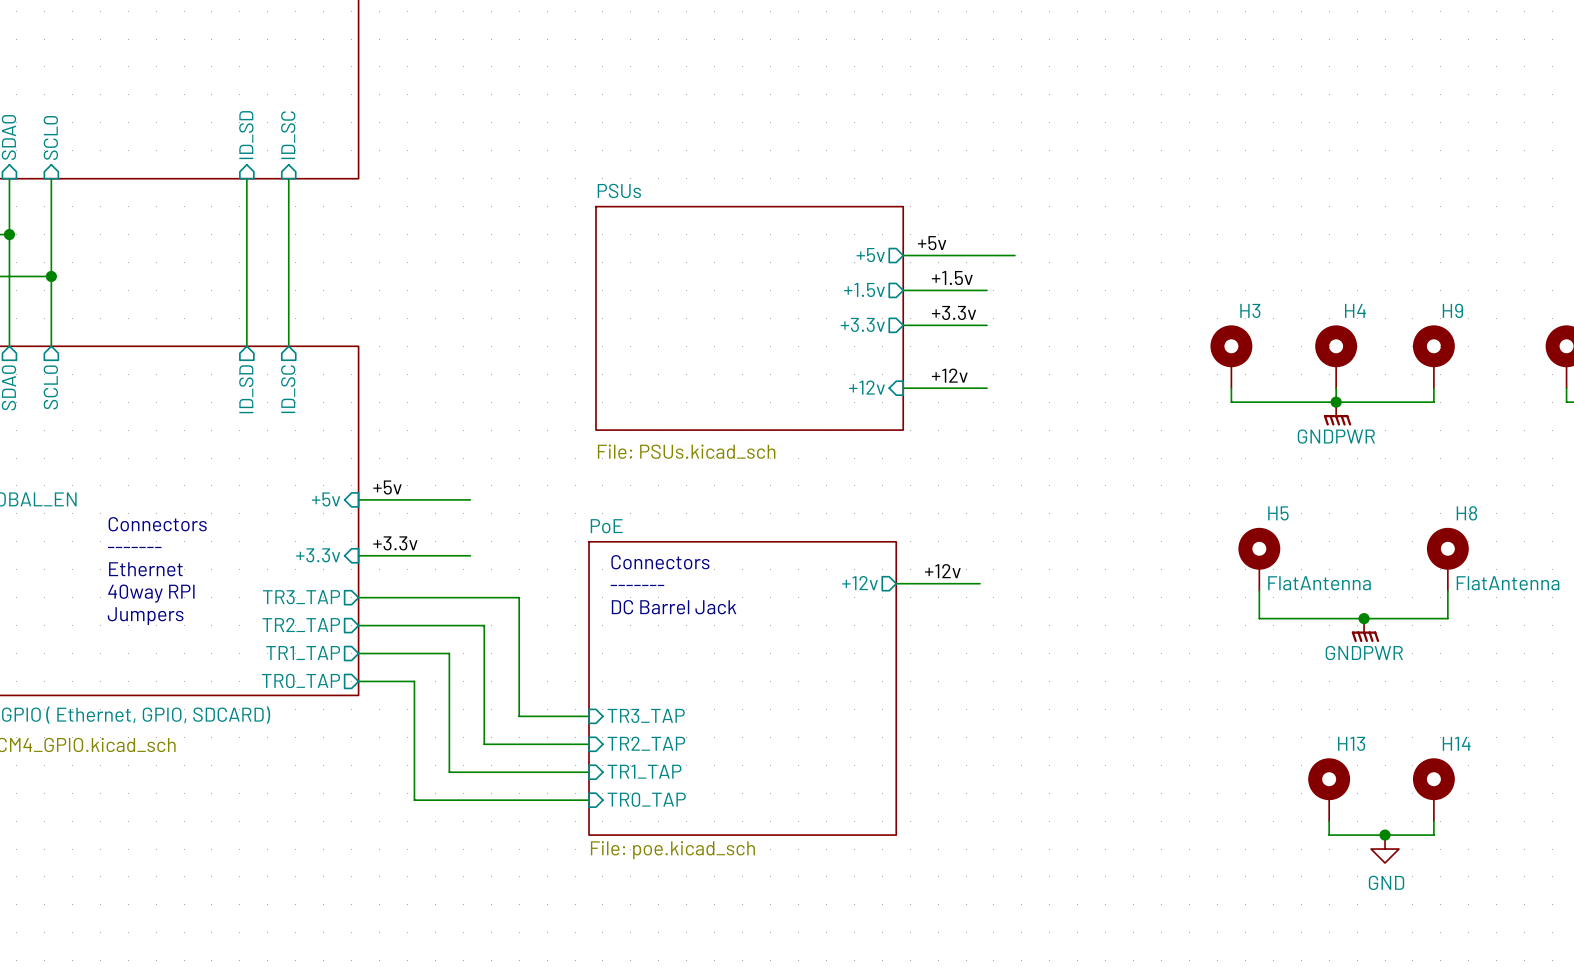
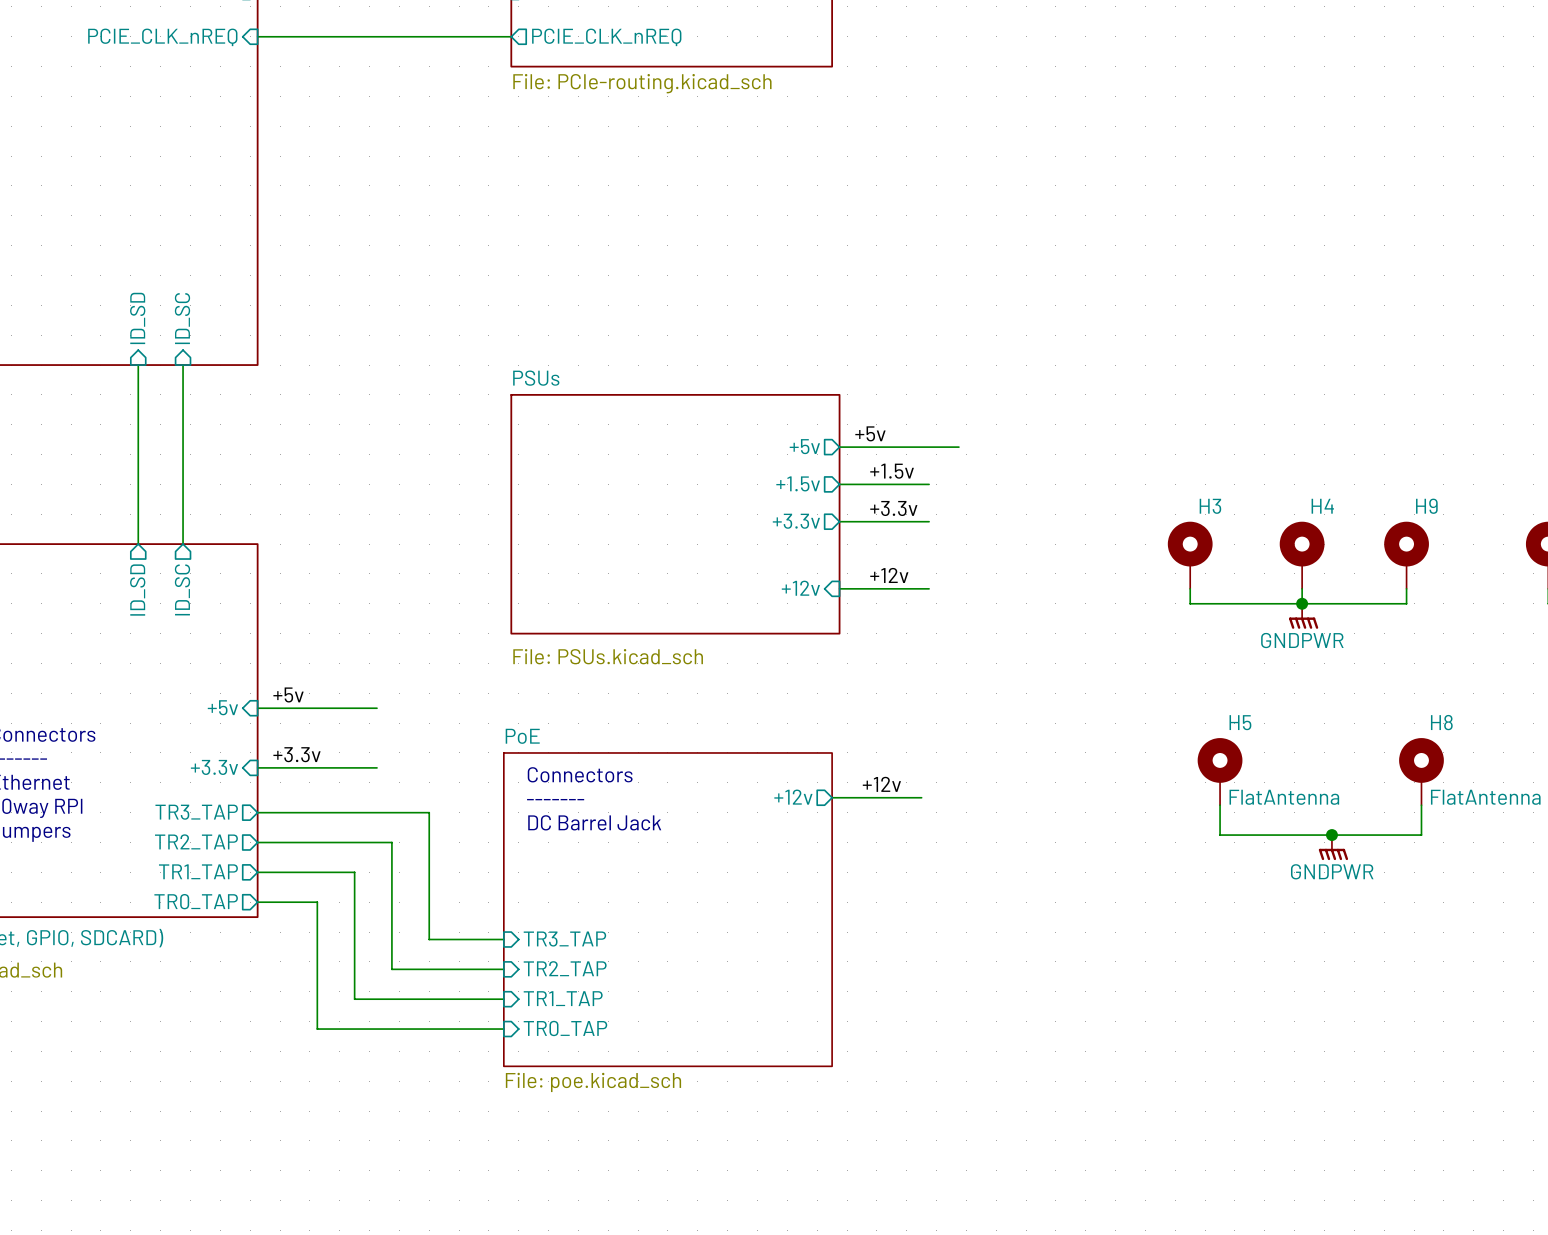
H13: (1329, 789) -> none
H14: (1433, 789) -> none
wire: (1329, 821) (1329, 835) (1433, 835) (1433, 821) -> none
junction: (1385, 835) -> none
power symbol: GND (1385, 849) -> none

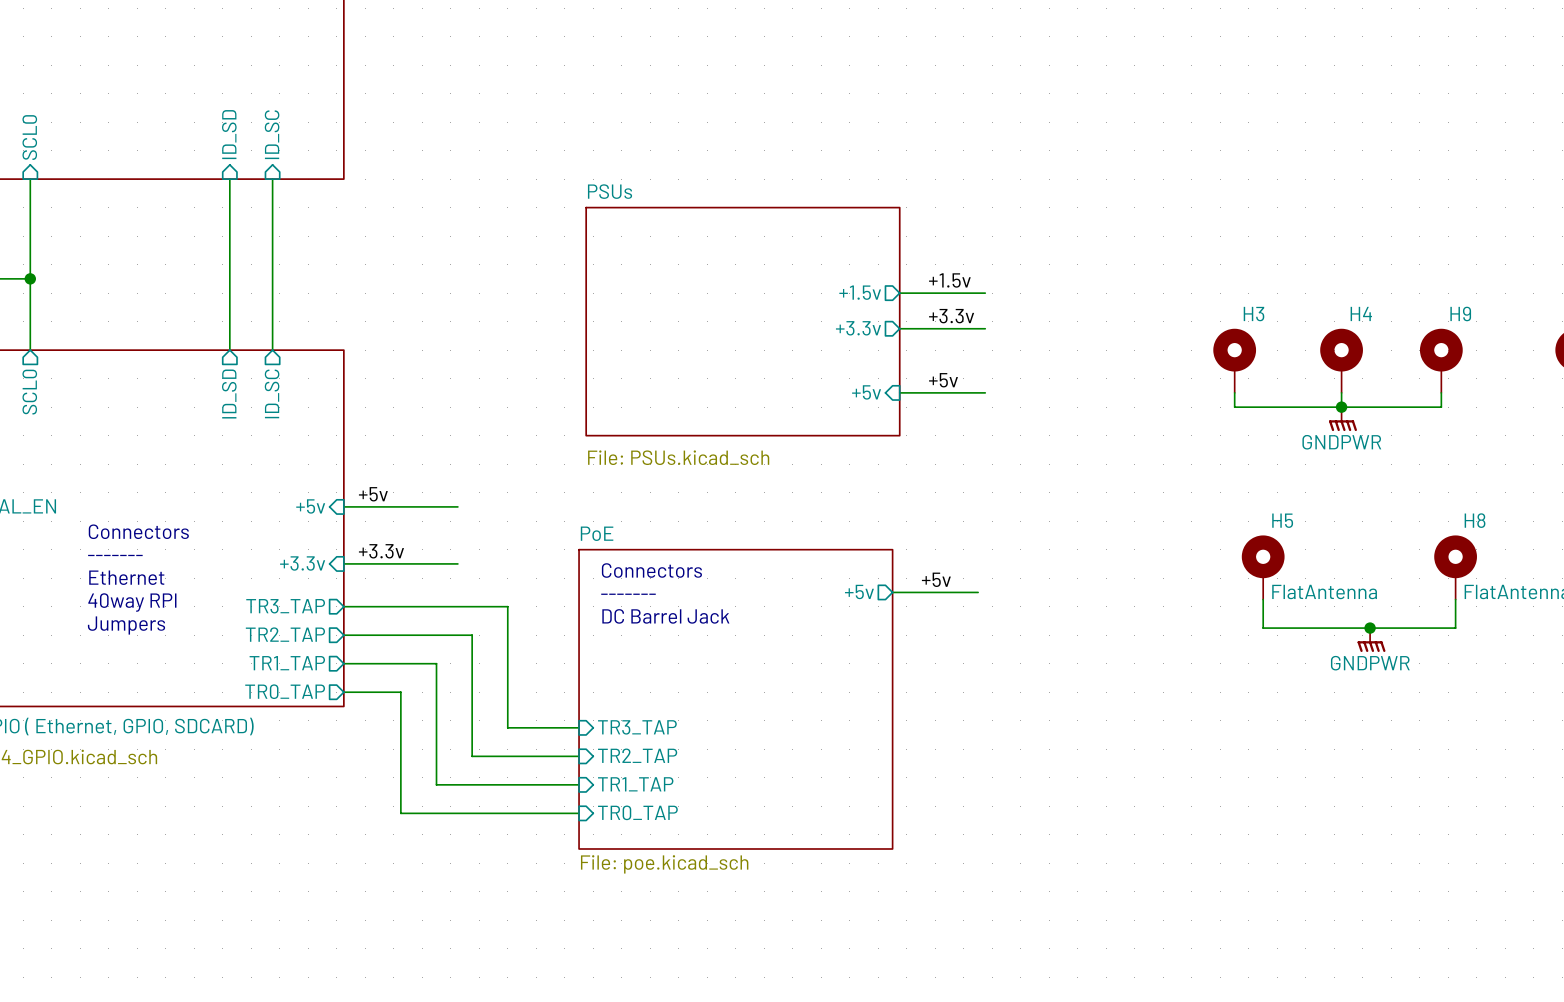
label: +5v (870, 433) -> none
sheet pin: +5v (804, 446) -> none
wire: (839, 447) (958, 447) -> none
label: +12v (889, 575) -> +5v (943, 380)
sheet pin: +12v (800, 588) -> +5v (866, 392)
label: +12v (881, 784) -> +5v (936, 579)
sheet pin: +12v (793, 797) -> +5v (859, 591)

